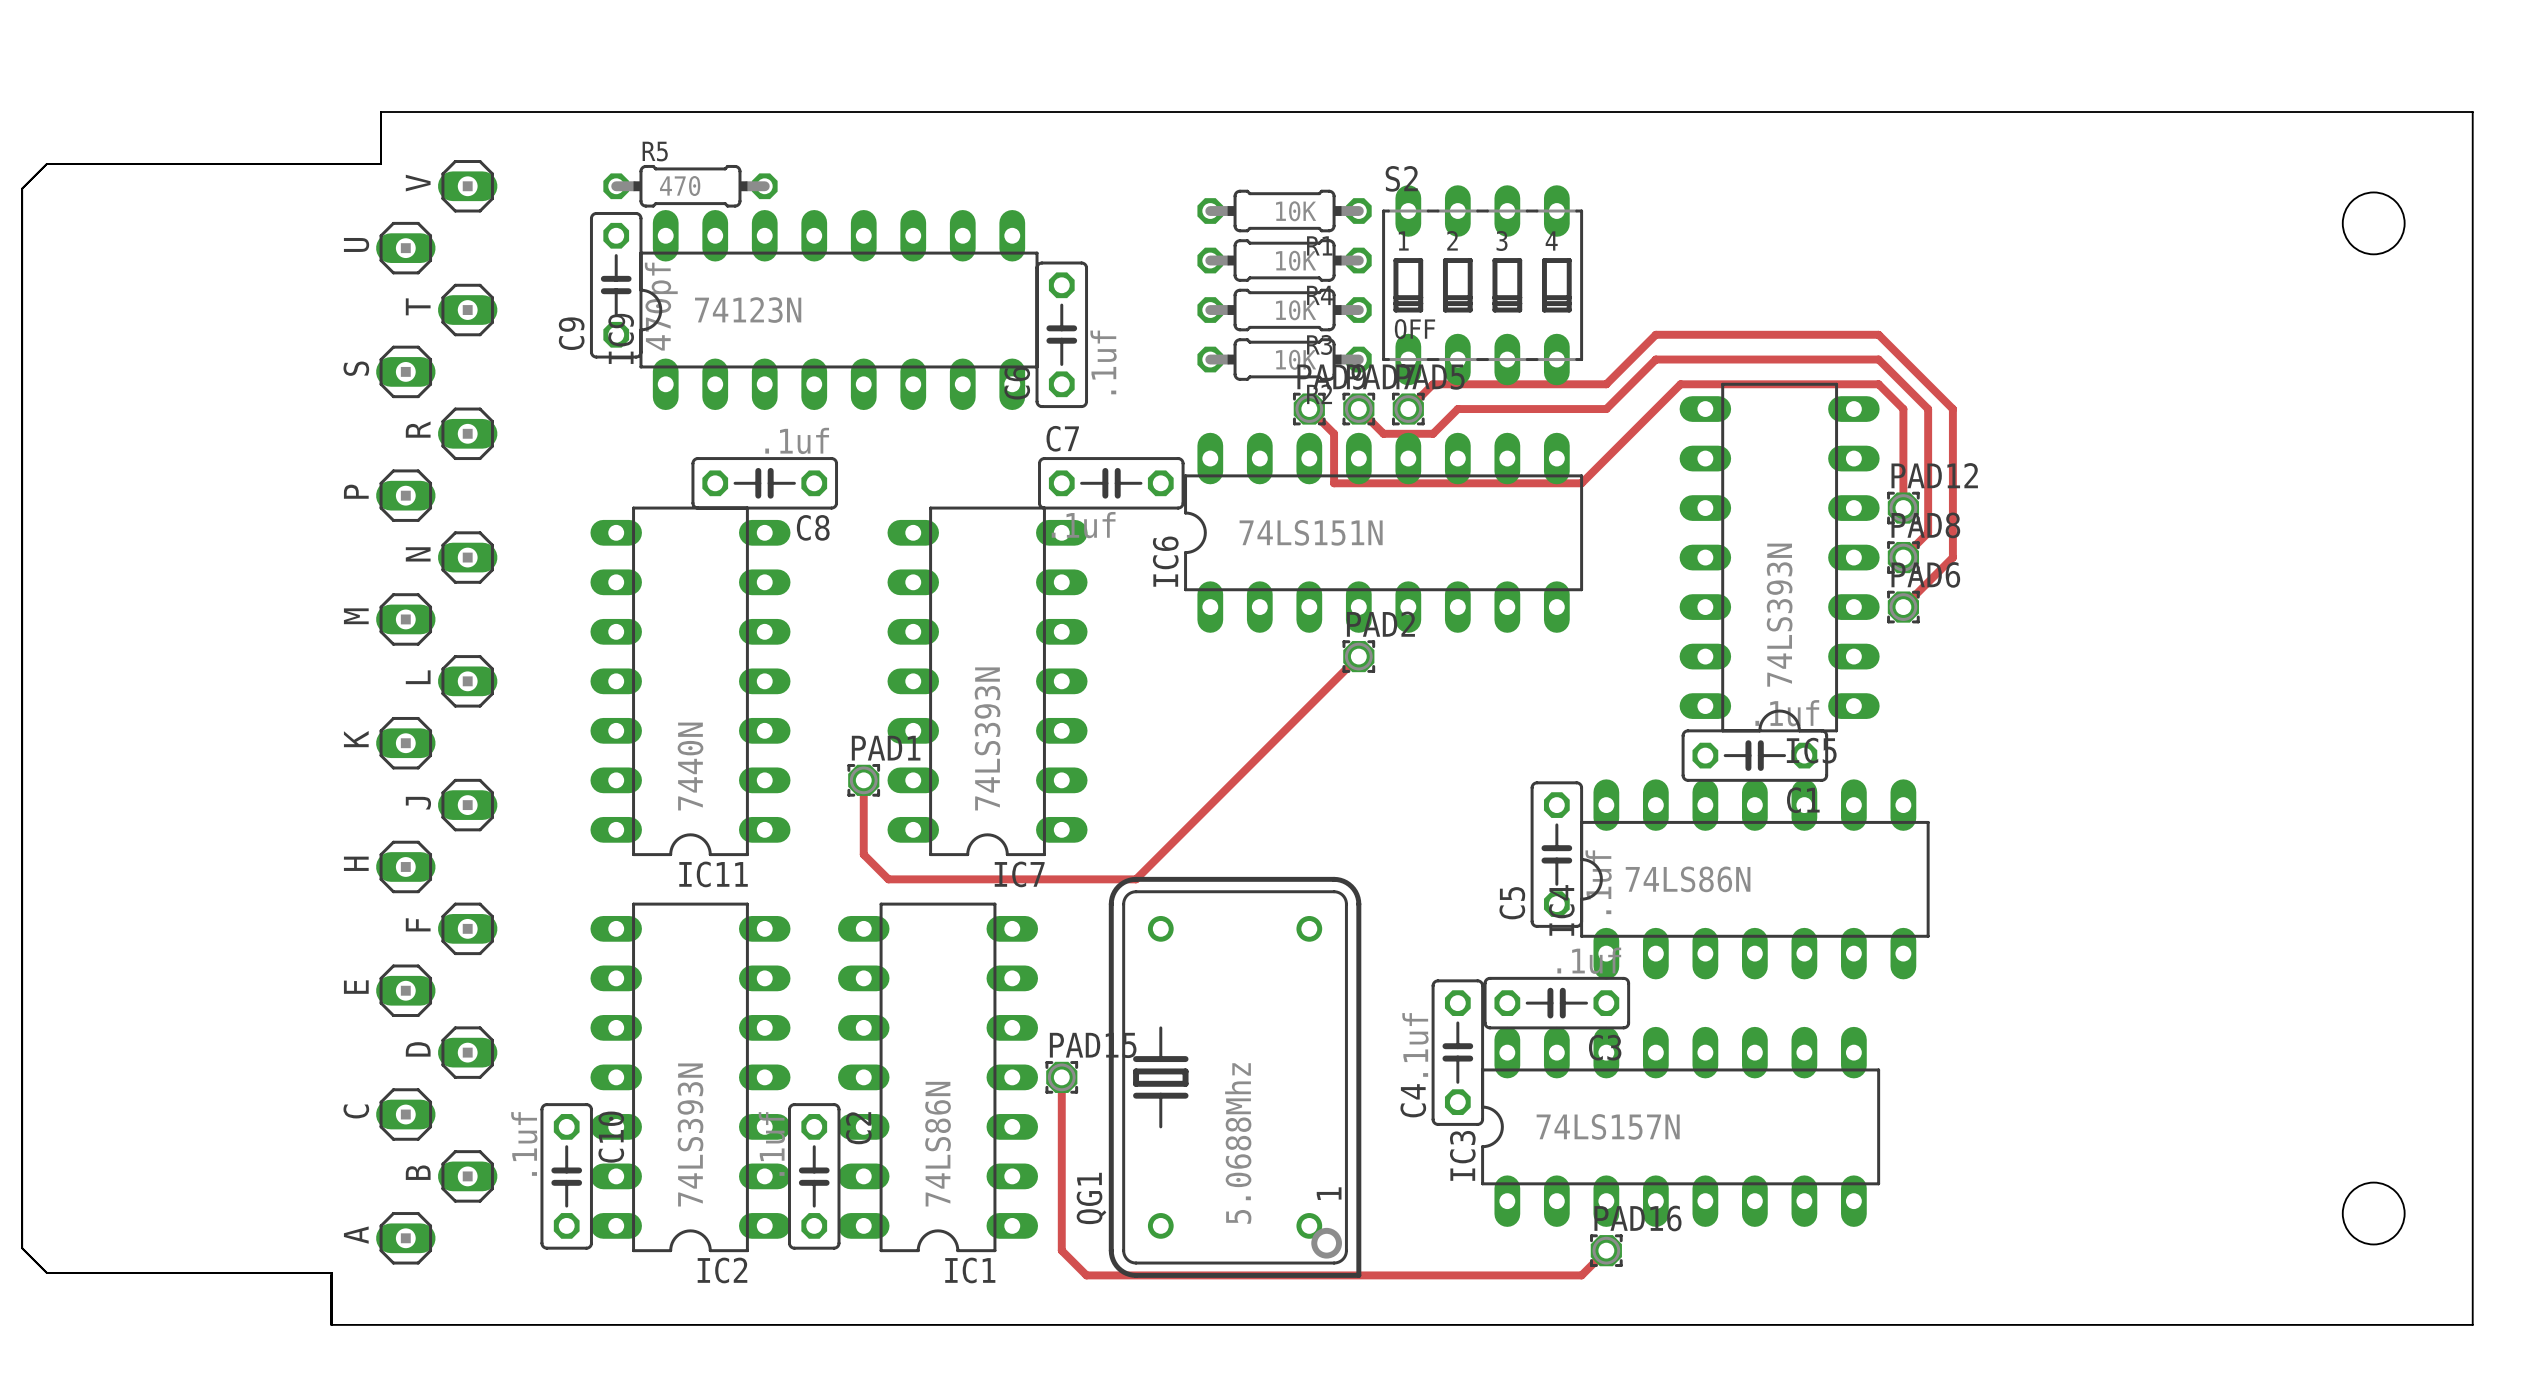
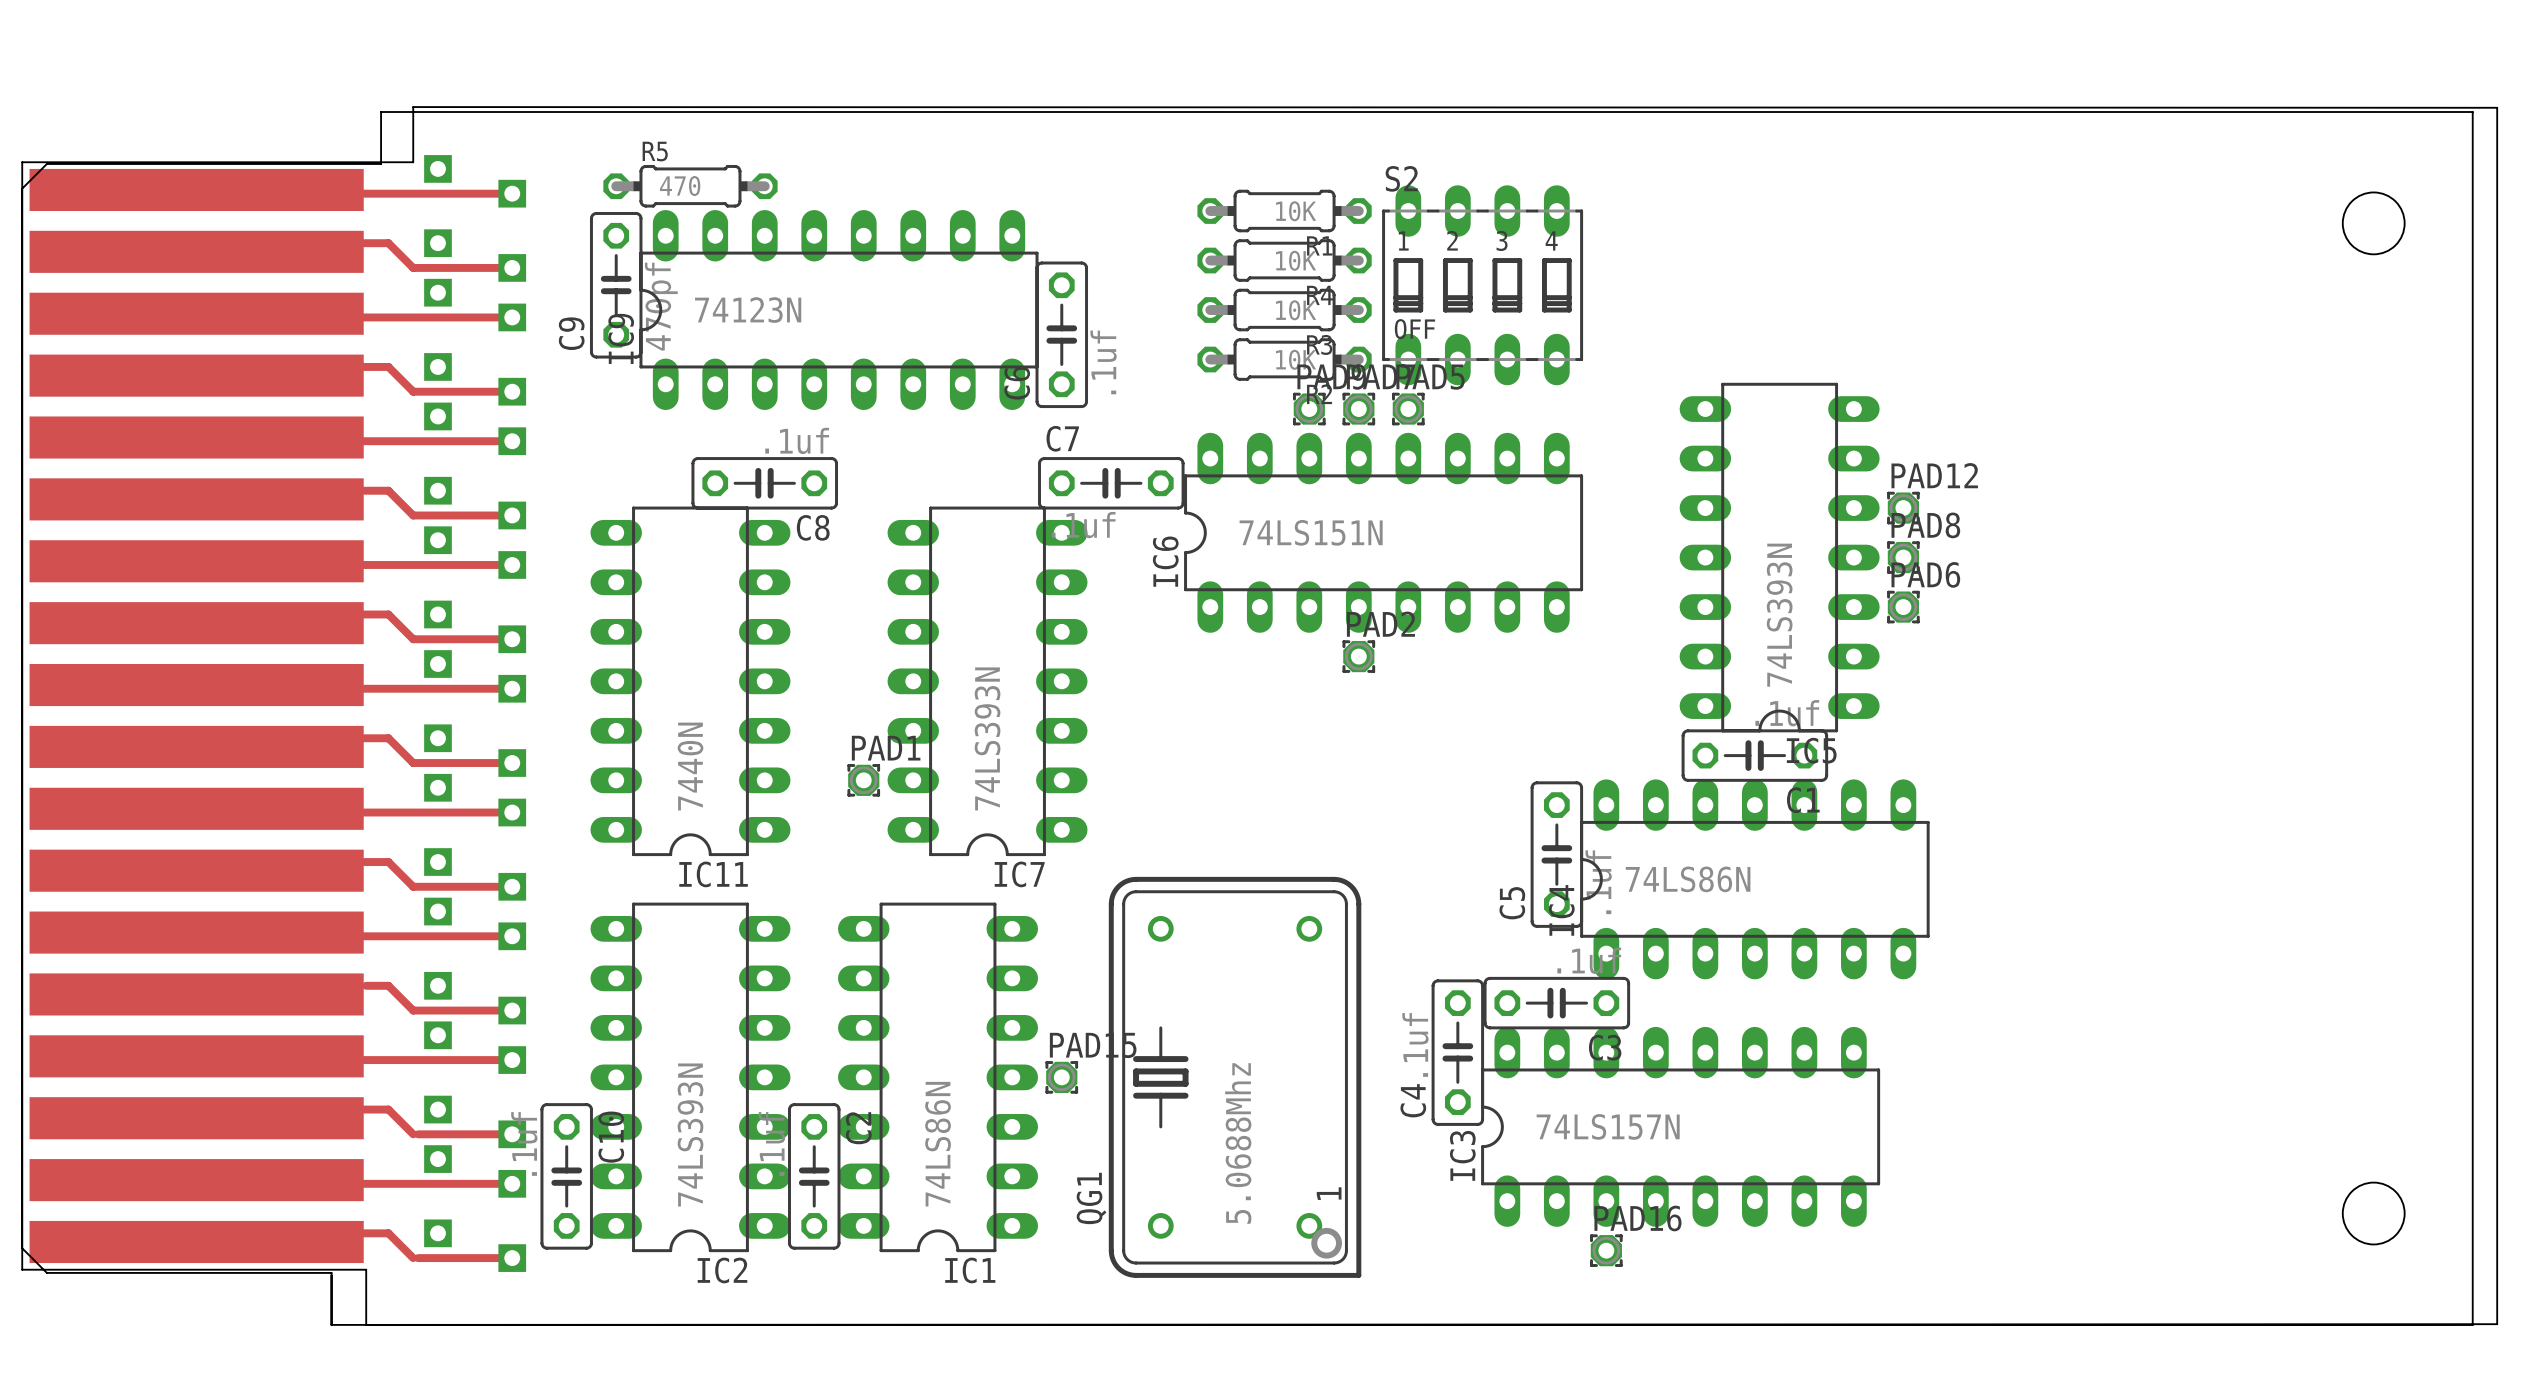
board edge: none -> (413, 107) (2497, 107) (2497, 1324) (366, 1324) (366, 1269) (22, 1269) (22, 162) (413, 162) (413, 107)
track: (1309, 409) (1334, 433) (1334, 483) (1581, 483) (1680, 384) (1878, 384) (1903, 409) (1903, 508) -> none
track: (1358, 409) (1383, 433) (1433, 433) (1457, 409) (1606, 409) (1655, 359) (1878, 359) (1928, 409) (1928, 532) (1903, 557) -> none
track: (1408, 409) (1433, 384) (1606, 384) (1655, 334) (1878, 334) (1952, 409) (1952, 557) (1903, 607) -> none
track: (1358, 656) (1136, 879) (888, 879) (863, 854) (863, 780) -> none
part: (436, 712) -> none
part: none -> (277, 713)
part: (201, 719) -> none
track: (1061, 1077) (1061, 1250) (1086, 1275) (1581, 1275) (1606, 1250) -> none

